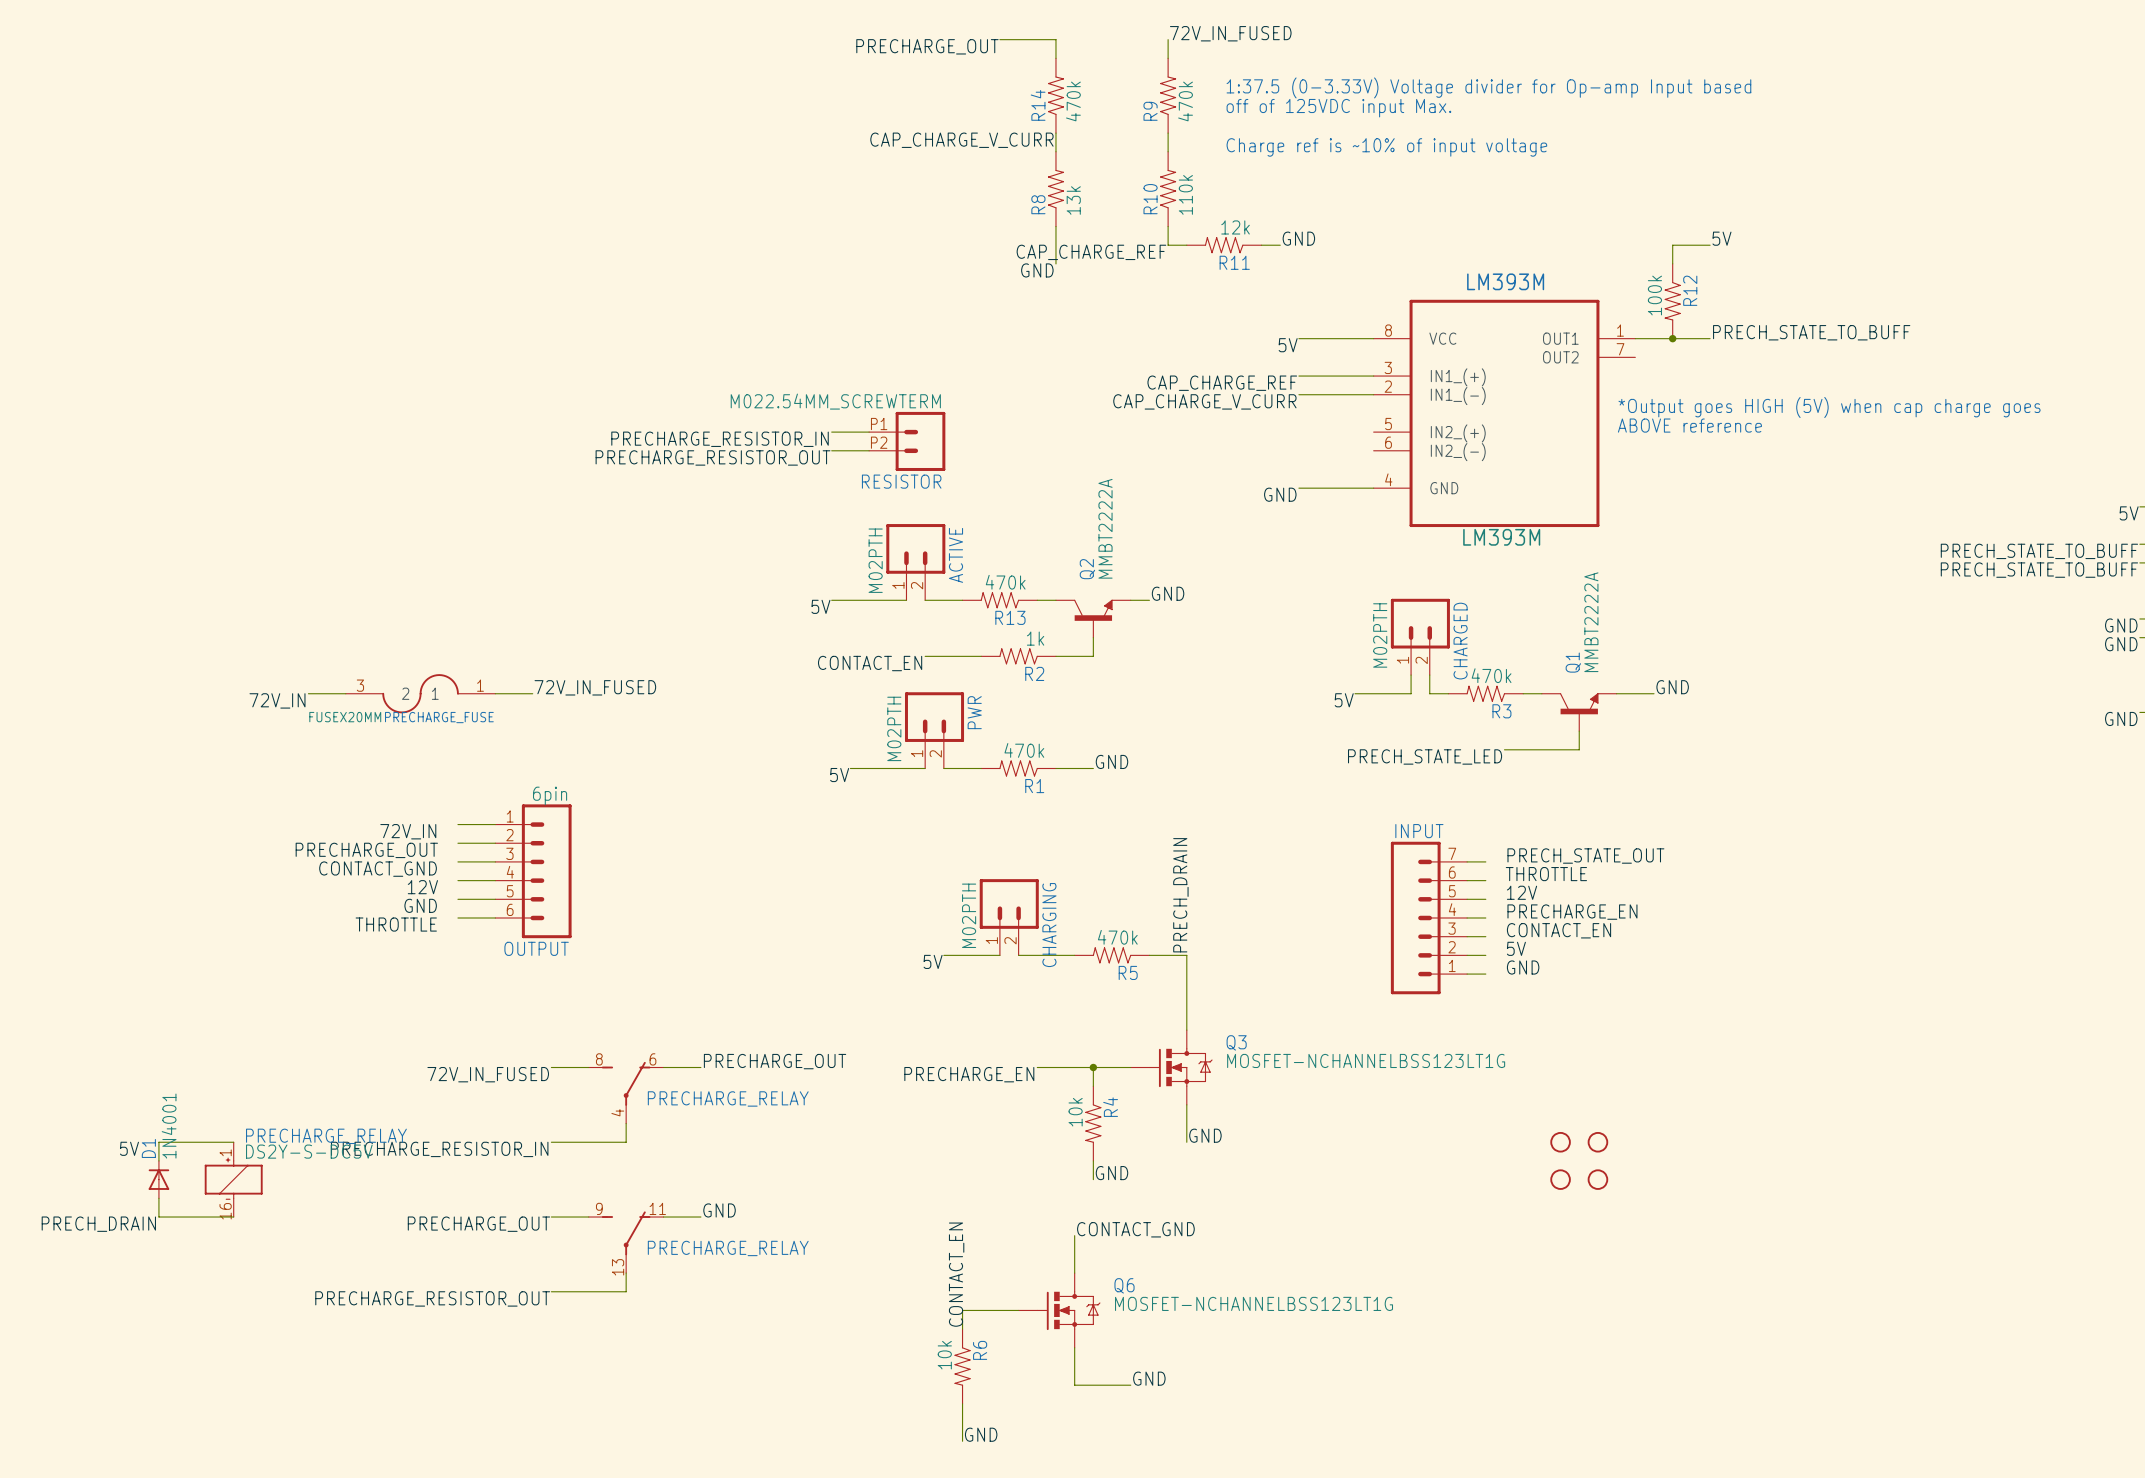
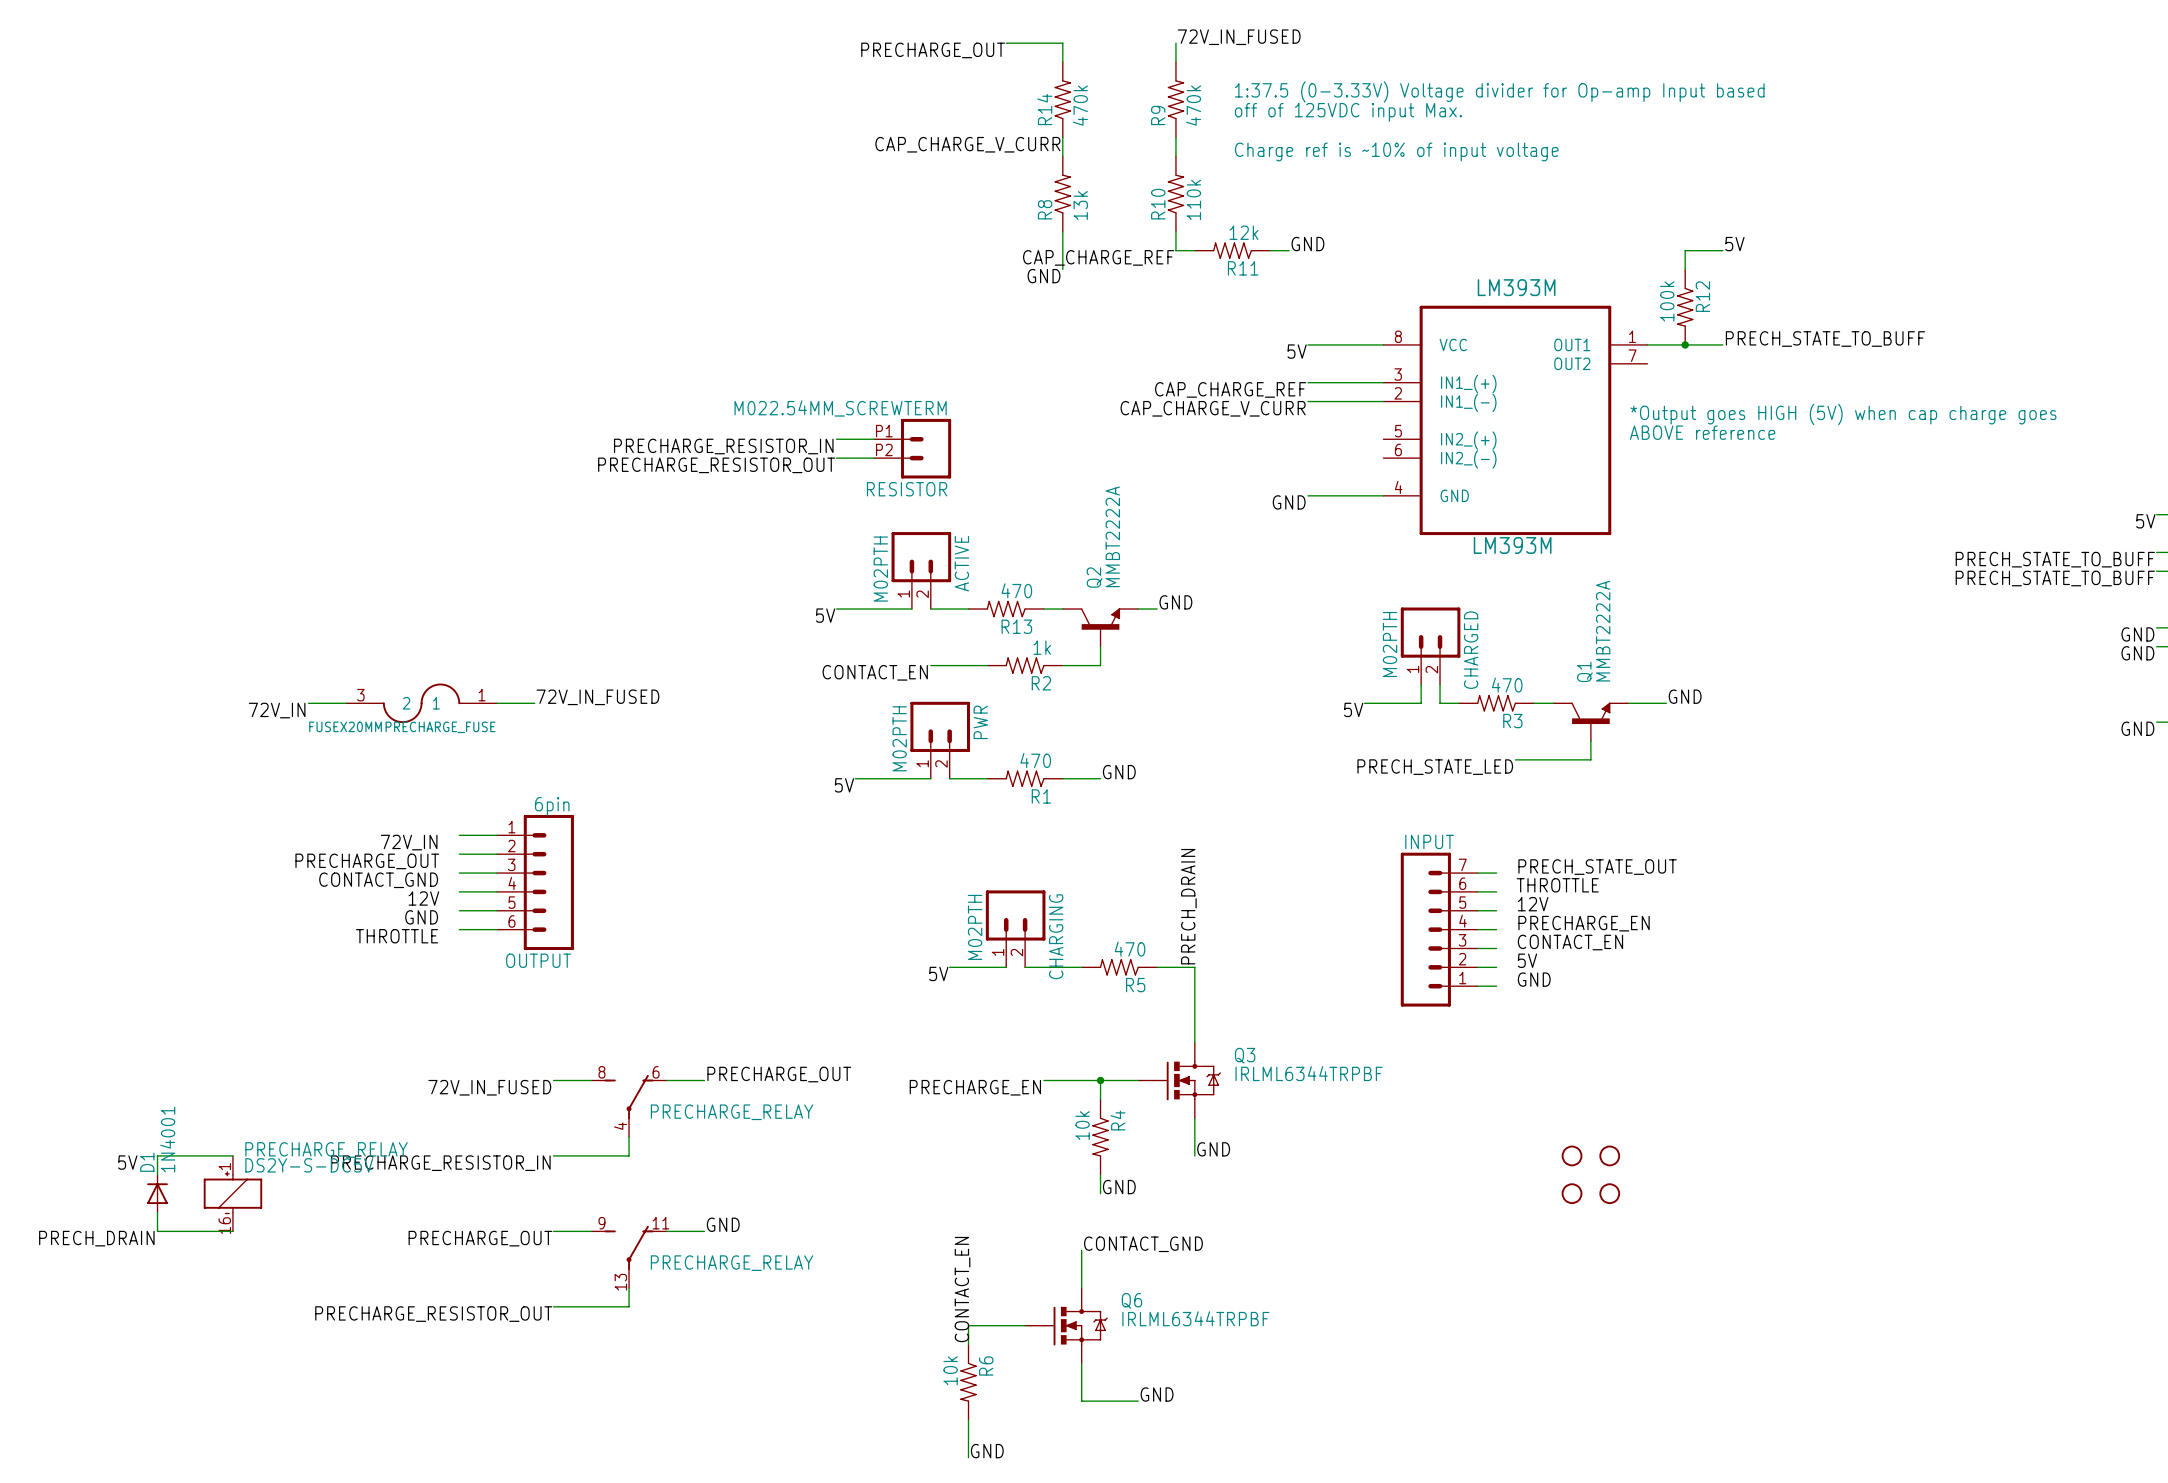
R13 value: 470k (1005, 582) -> 470 (1016, 590)
R3 value: 470k (1491, 675) -> 470 (1507, 685)
R1 value: 470k (1024, 750) -> 470 (1035, 760)
R5 value: 470k (1117, 937) -> 470 (1130, 949)
Q3 value: MOSFET-NCHANNELBSS123LT1G (1366, 1060) -> IRLML6344TRPBF (1309, 1073)
Q6 value: MOSFET-NCHANNELBSS123LT1G (1254, 1303) -> IRLML6344TRPBF (1195, 1318)

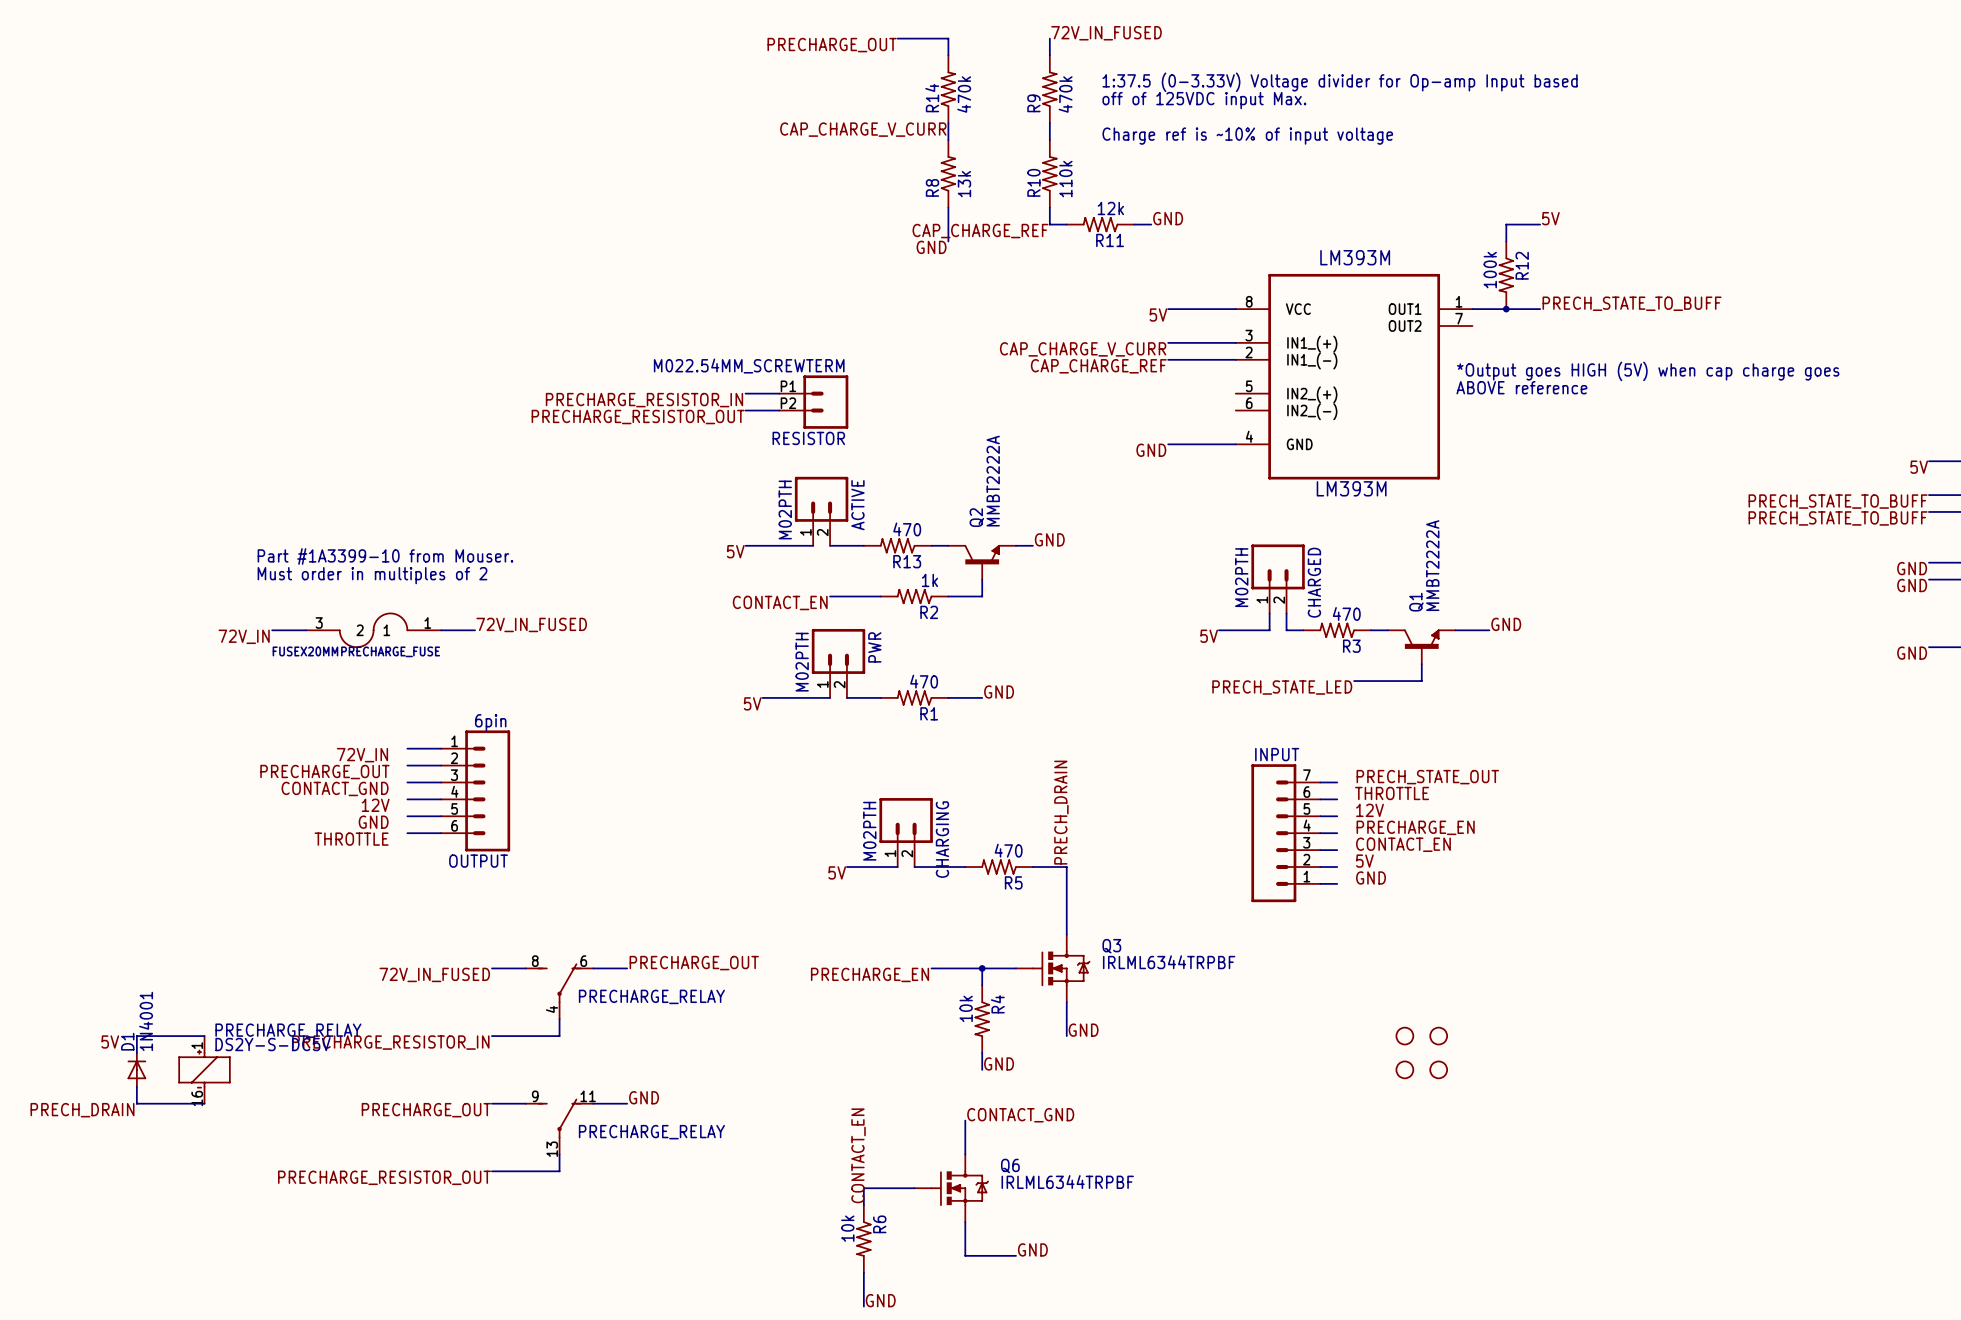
label: CAP_CHARGE_REF (1230, 389) -> CAP_CHARGE_V_CURR (1083, 349)
label: CAP_CHARGE_V_CURR (1213, 408) -> CAP_CHARGE_REF (1098, 366)
text: none -> Part #1A3399-10 from Mouser. (385, 556)
text: none -> Must order in multiples of 2 (372, 575)

